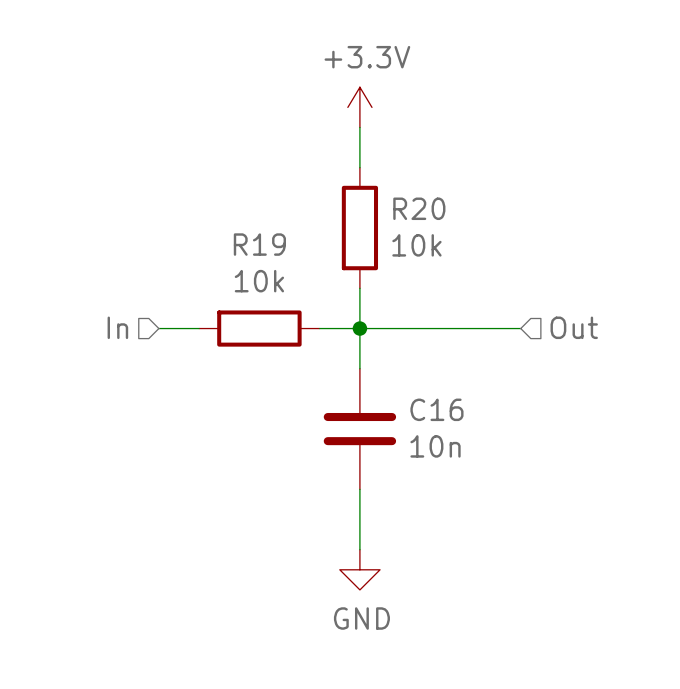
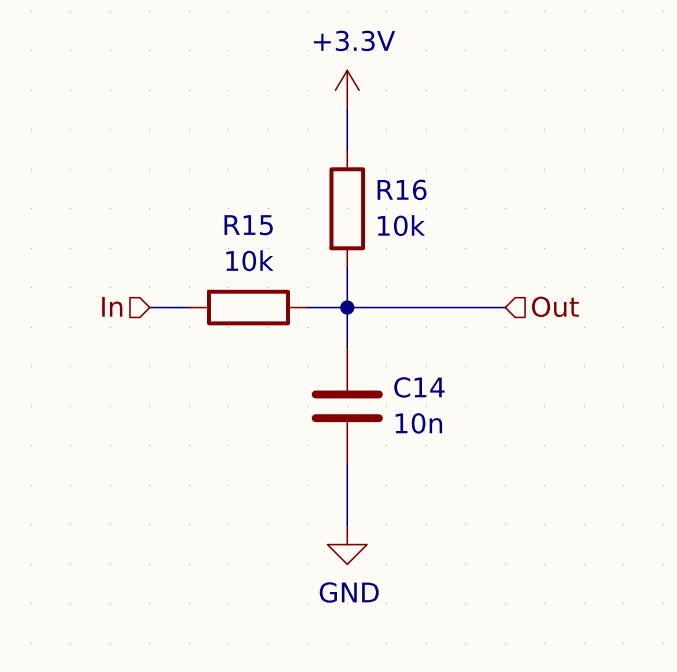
R20 name: R20 (419, 208) -> R16 (402, 189)
R19 name: R19 (259, 244) -> R15 (248, 225)
C16 name: C16 (436, 409) -> C14 (419, 387)

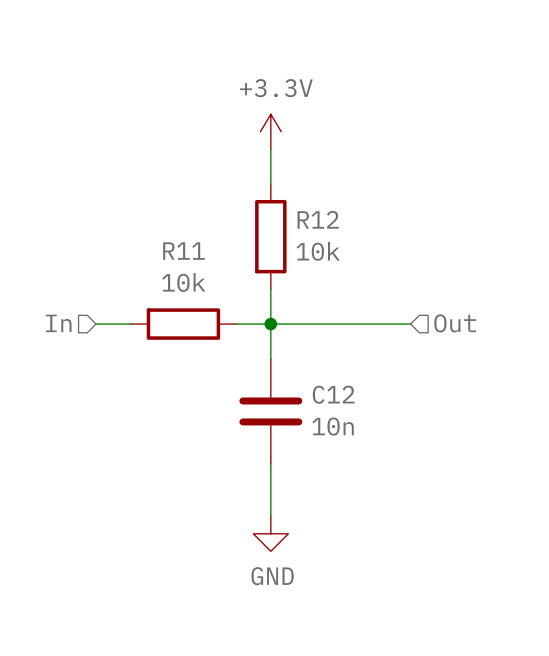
R16 name: R16 (402, 189) -> R12 (318, 219)
R15 name: R15 (248, 225) -> R11 (183, 251)
C14 name: C14 (419, 387) -> C12 (333, 394)

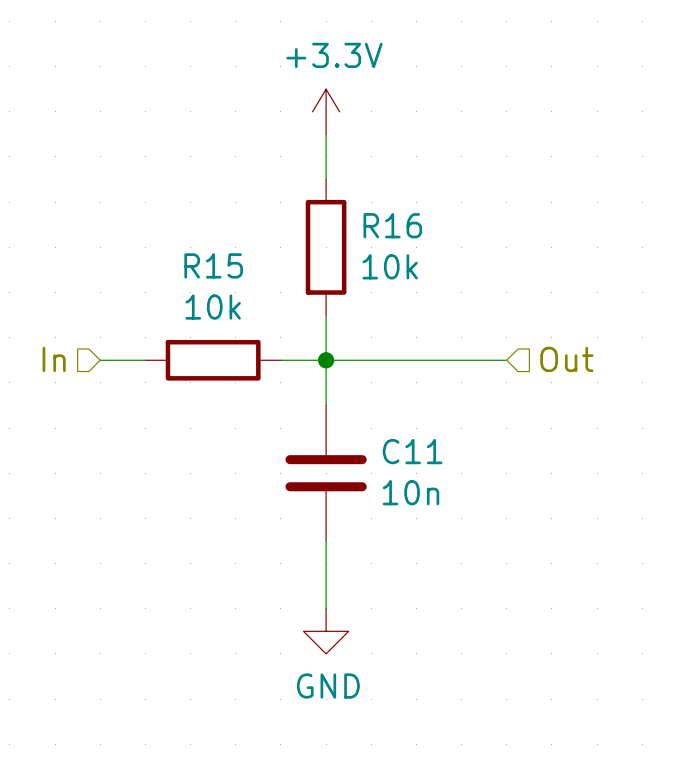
R12 name: R12 (318, 219) -> R16 (392, 225)
R11 name: R11 (183, 251) -> R15 (213, 265)
C12 name: C12 (333, 394) -> C11 (412, 451)

